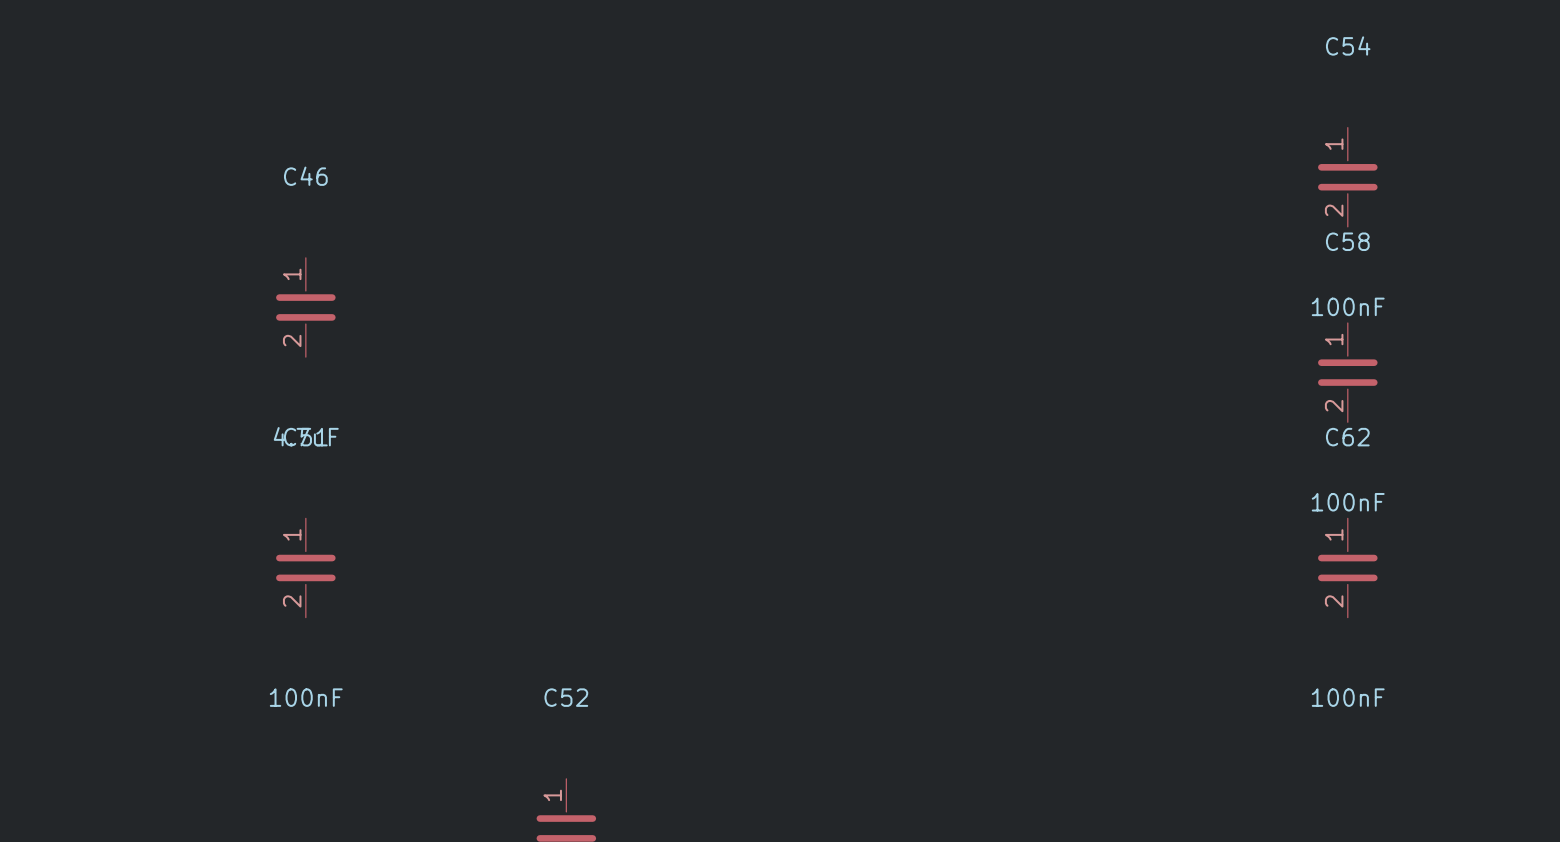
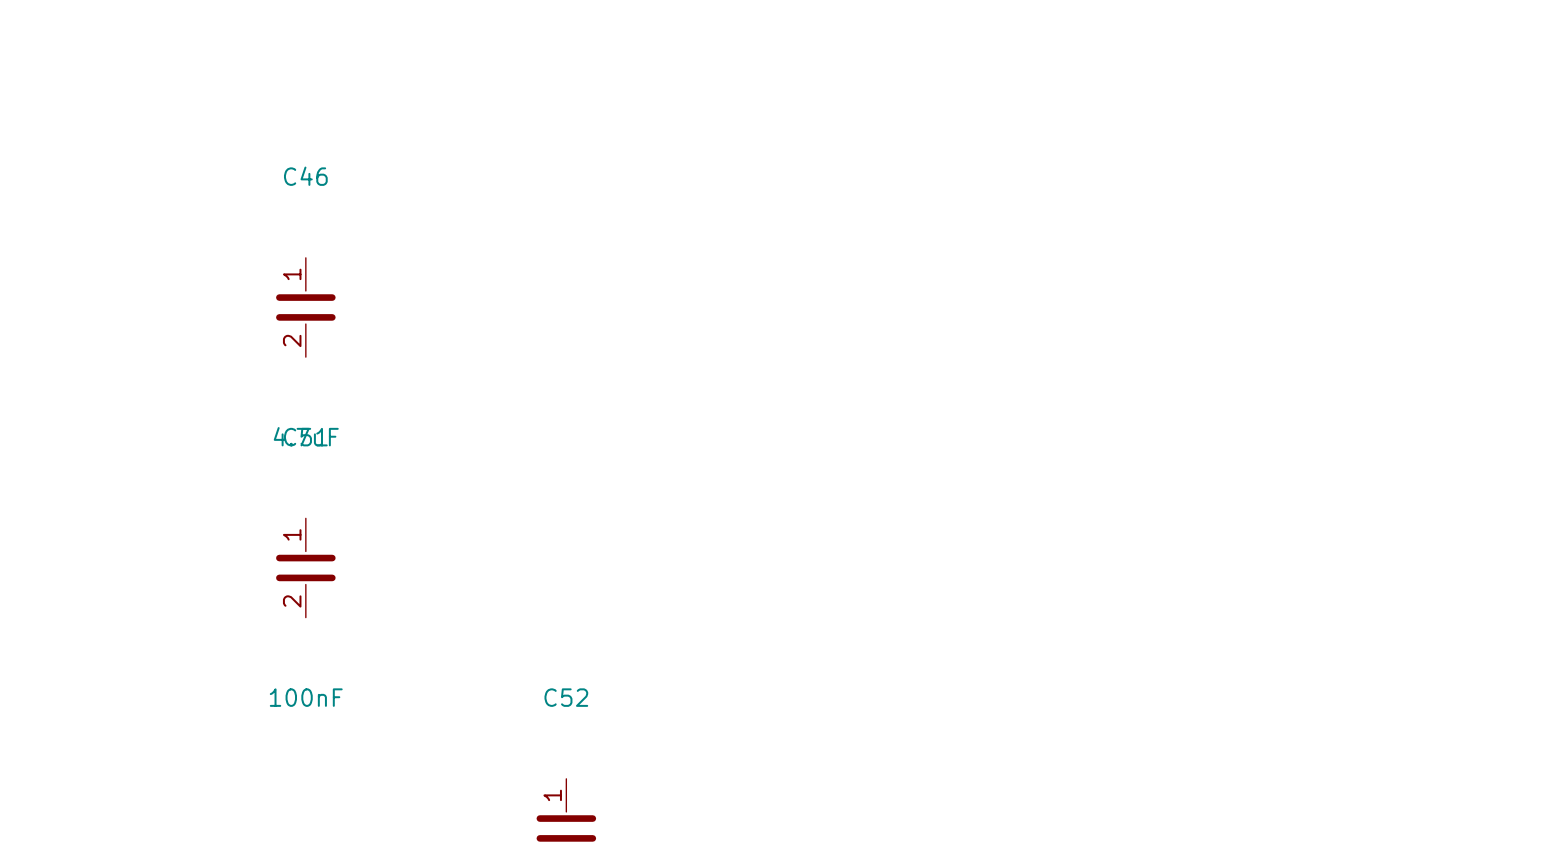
C54: 100nF (1347, 177) -> none
C58: 100nF (1347, 372) -> none
C62: 100nF (1347, 567) -> none

